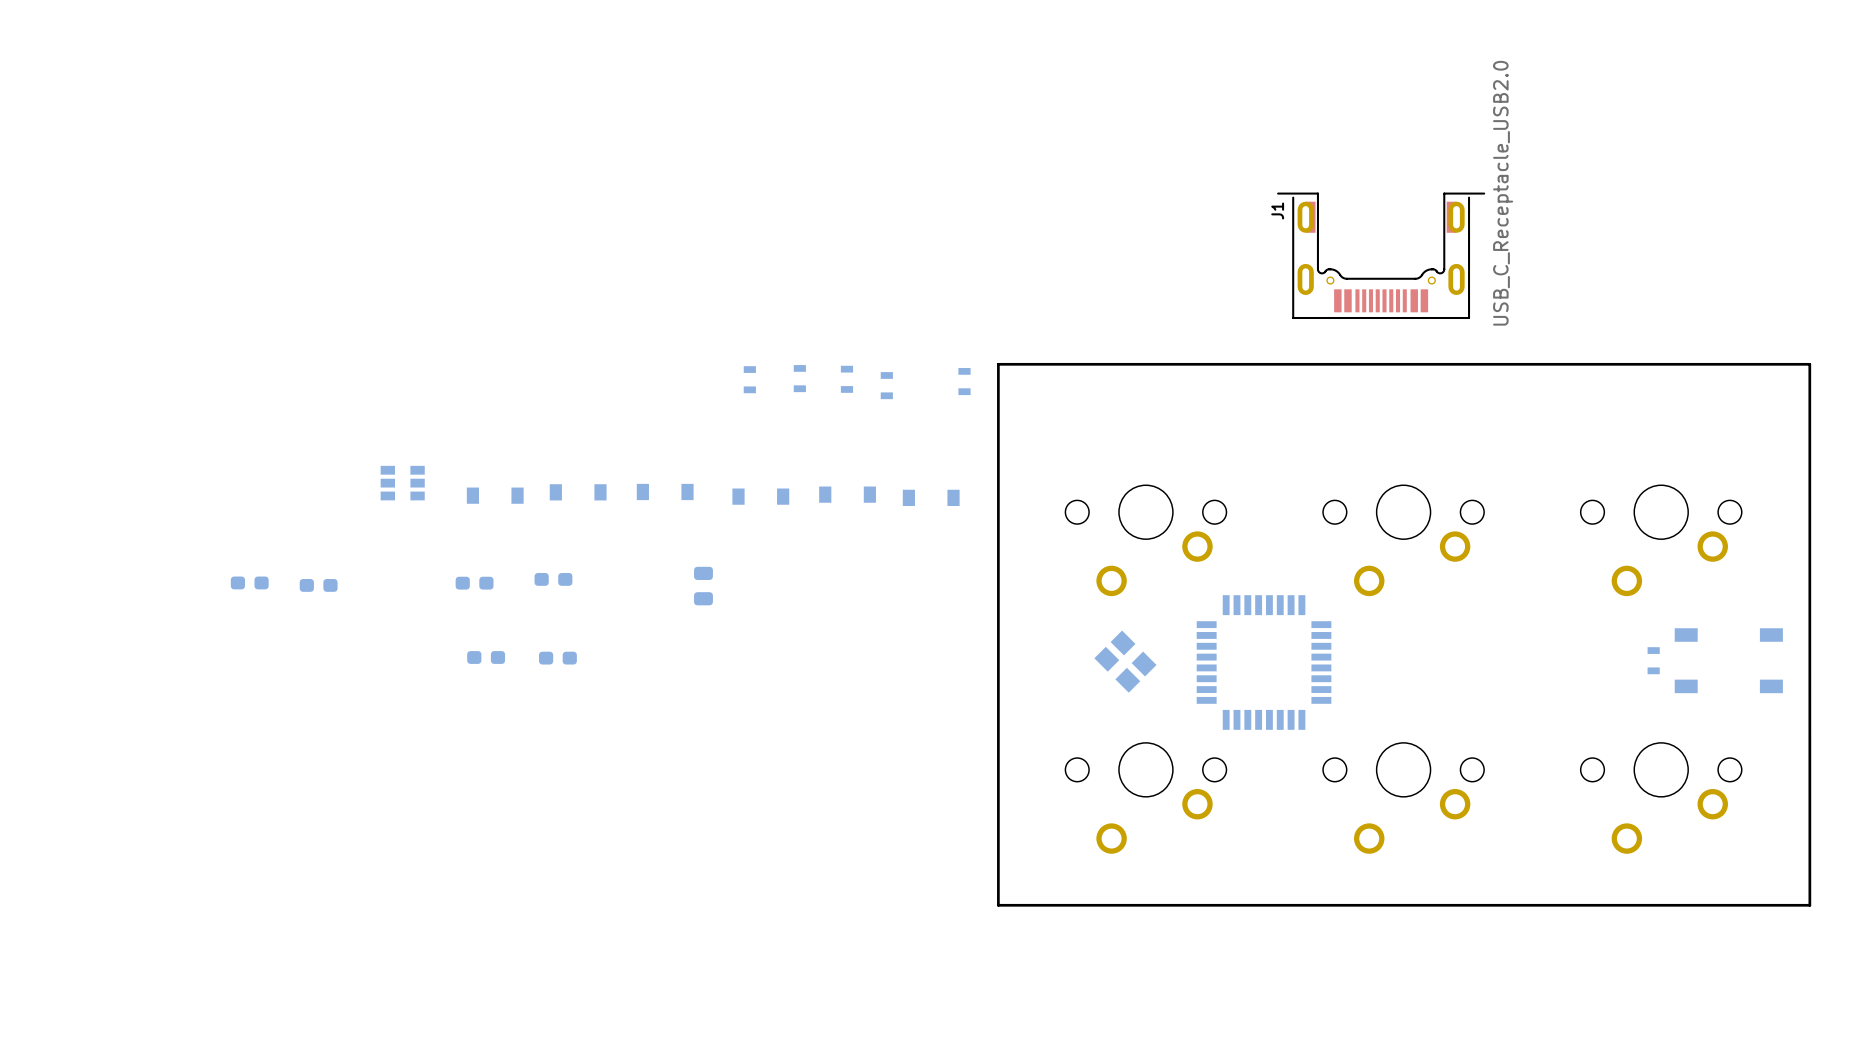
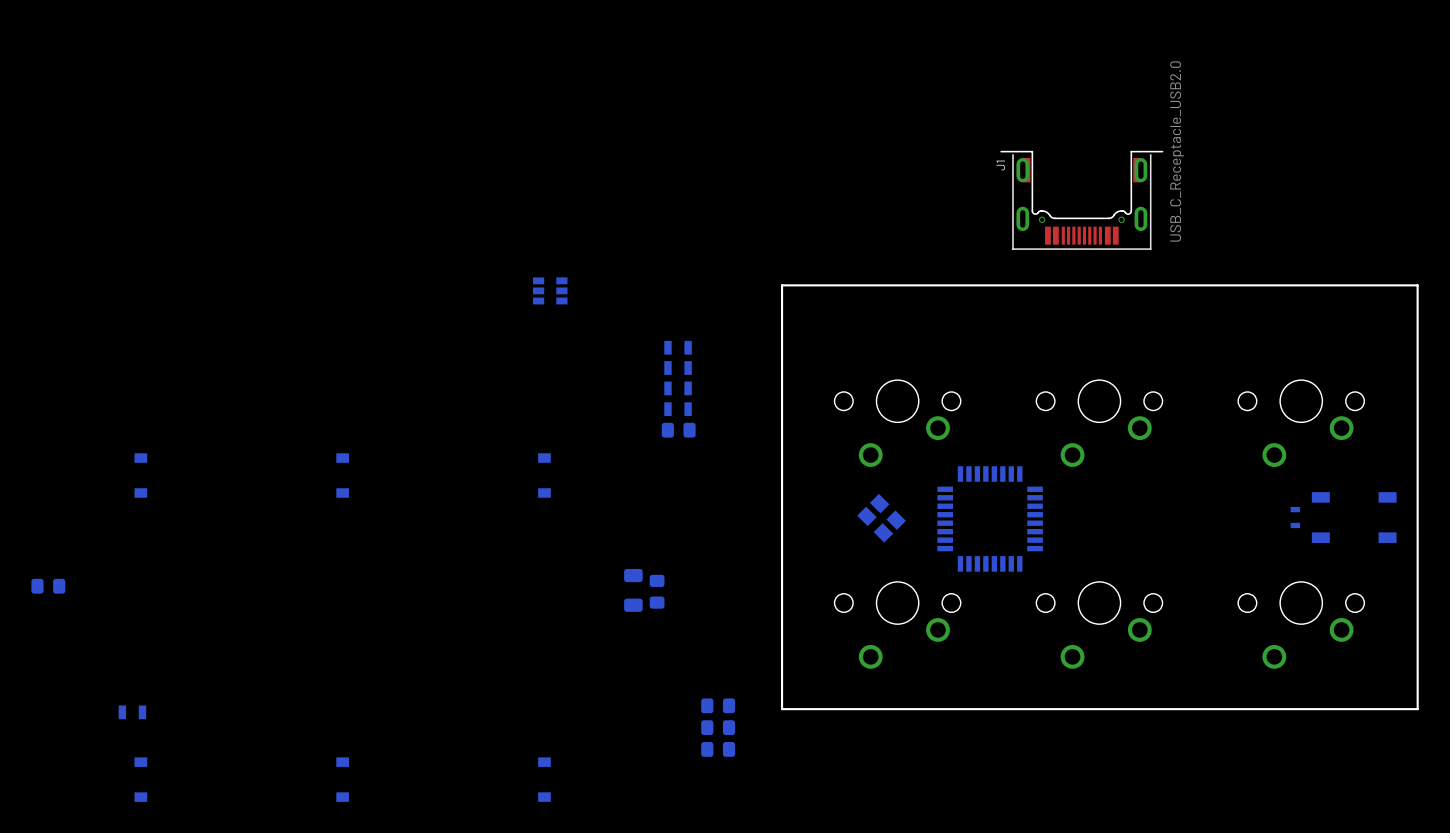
part: (799, 378) -> none
part: (749, 379) -> none
part: (846, 379) -> none
part: (964, 381) -> none
part: (886, 385) -> none
part: none -> (678, 347)
part: none -> (678, 368)
part position: (402, 483) -> (550, 290)
part: (665, 491) -> none
part: (578, 492) -> none
part: (847, 494) -> none
part: (495, 495) -> none
part: none -> (678, 388)
part: (760, 496) -> none
part: (931, 497) -> none
part: none -> (678, 409)
part: none -> (678, 430)
part: (553, 579) -> none
part: (249, 582) -> none
part: (474, 583) -> none
part: (318, 585) -> none
part: (703, 586) -> none
part: none -> (140, 475)
part: none -> (342, 475)
part: none -> (544, 475)
part: (486, 657) -> none
part: (557, 658) -> none
part: none -> (48, 586)
part: none -> (633, 590)
part: none -> (657, 591)
part: none -> (718, 705)
part: none -> (132, 712)
part: none -> (718, 727)
part: none -> (718, 749)
part: none -> (140, 779)
part: none -> (342, 779)
part: none -> (544, 779)

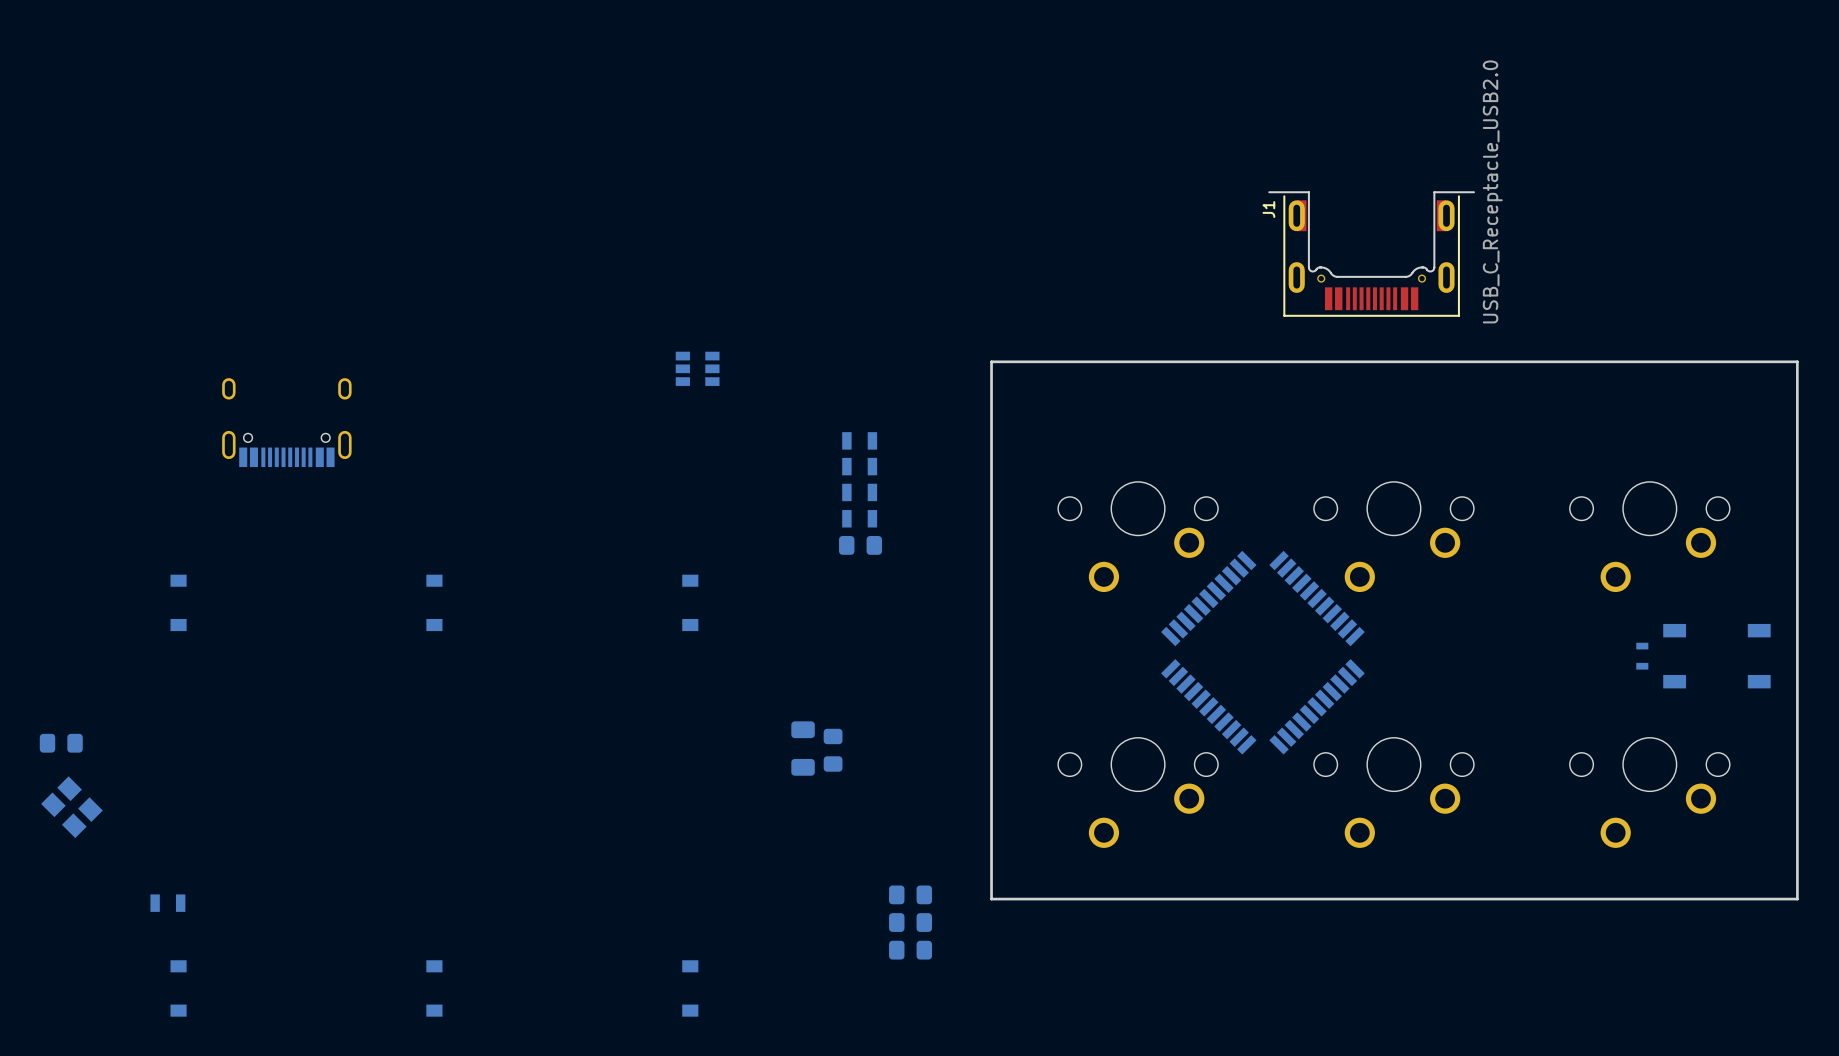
part: none -> (286, 422)
part footprint: [937, 466, 1043, 572] -> [1161, 550, 1365, 755]
part: (881, 518) -> none
part: none -> (71, 807)

